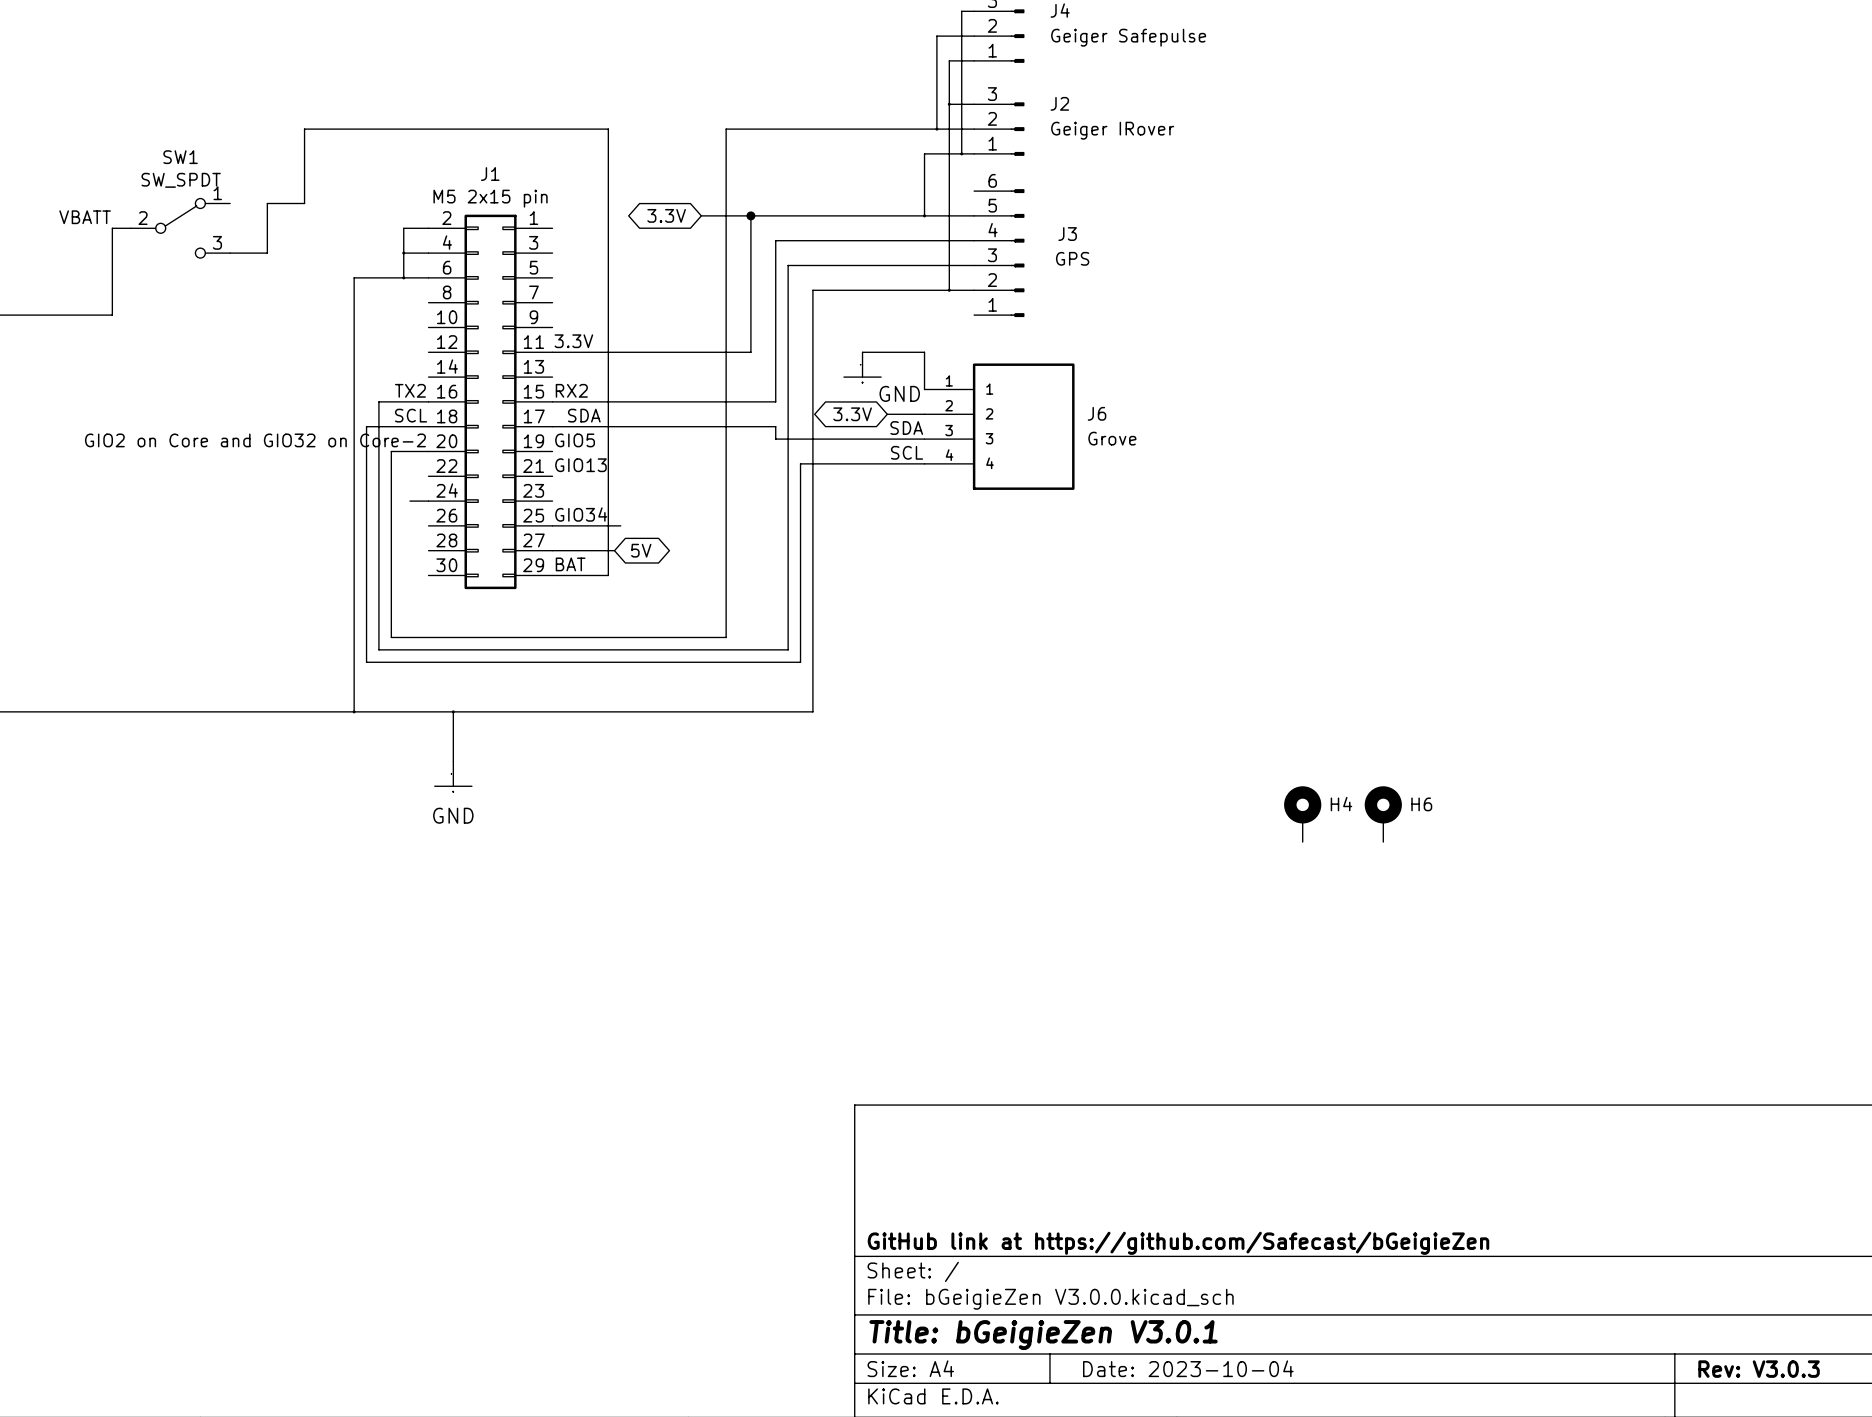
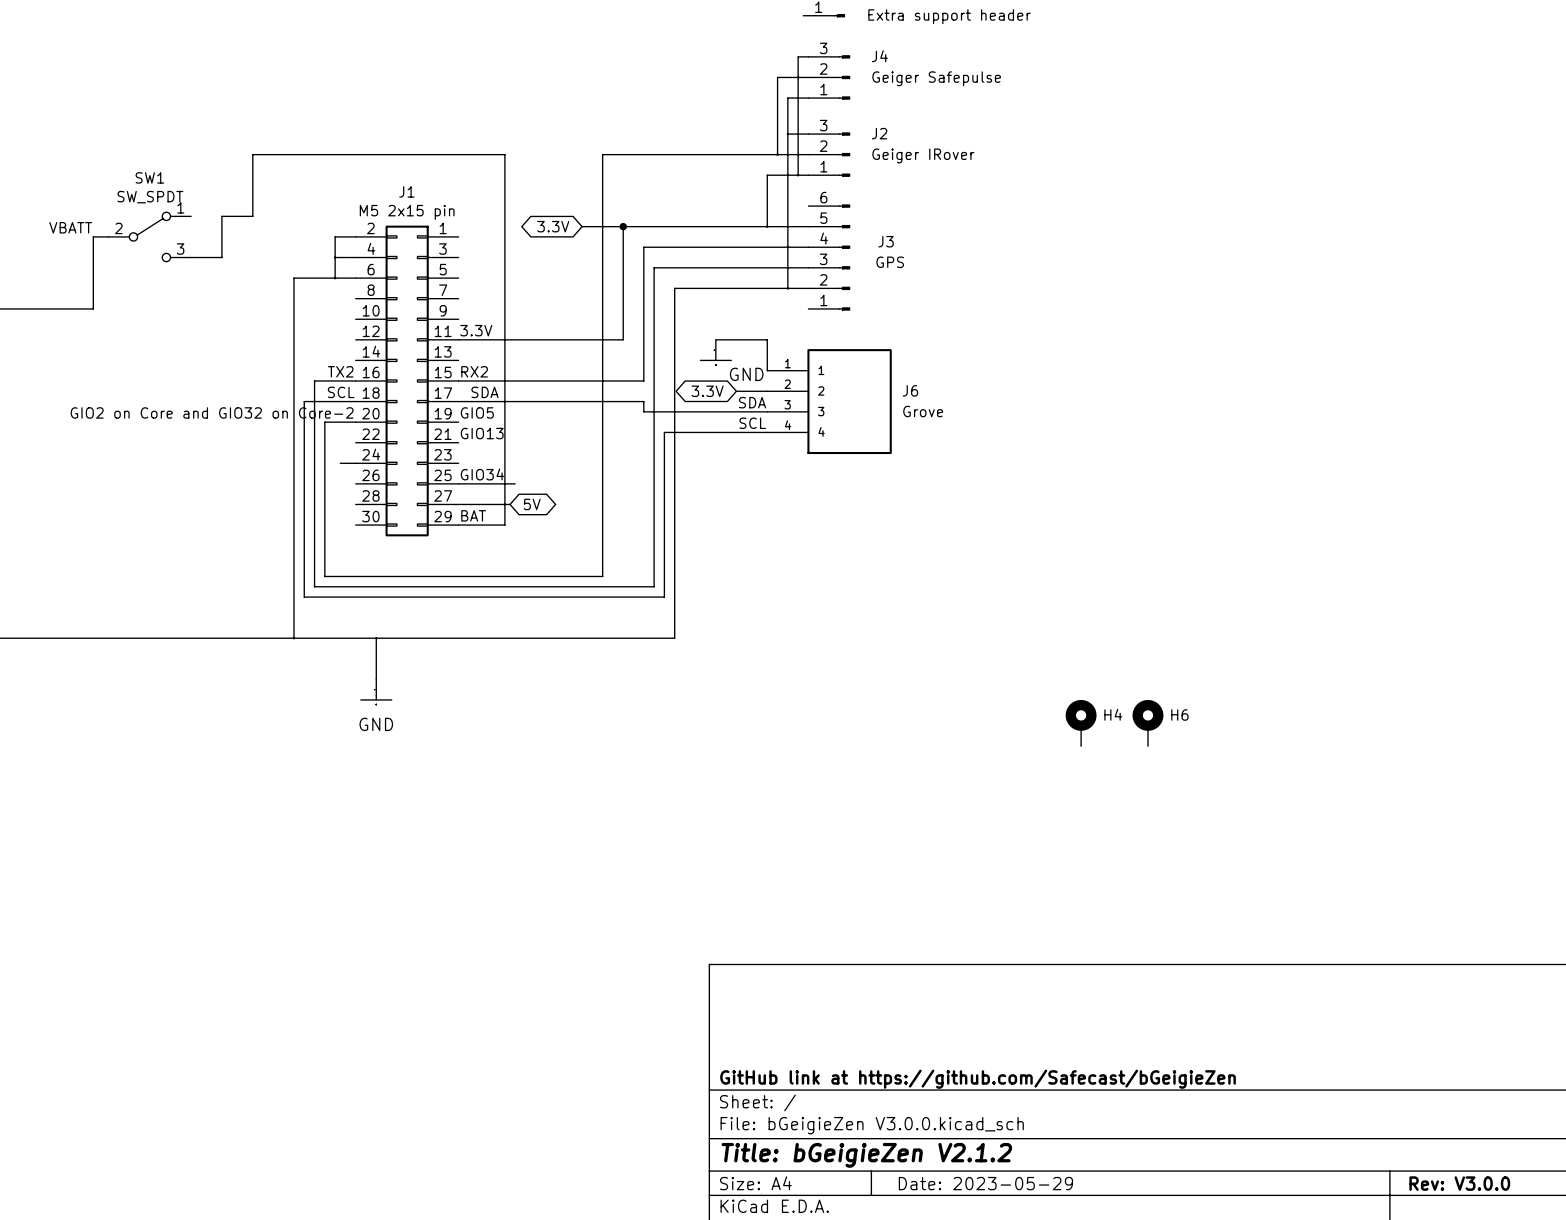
title block: Title: bGeigieZen V3.0.1 (1043, 1335) -> Title: bGeigieZen V2.1.2 (866, 1155)
title block: Date: 2023-10-04 (1188, 1368) -> Date: 2023-05-29 (985, 1183)
title block: Rev: V3.0.3 (1759, 1369) -> Rev: V3.0.0 (1459, 1183)

